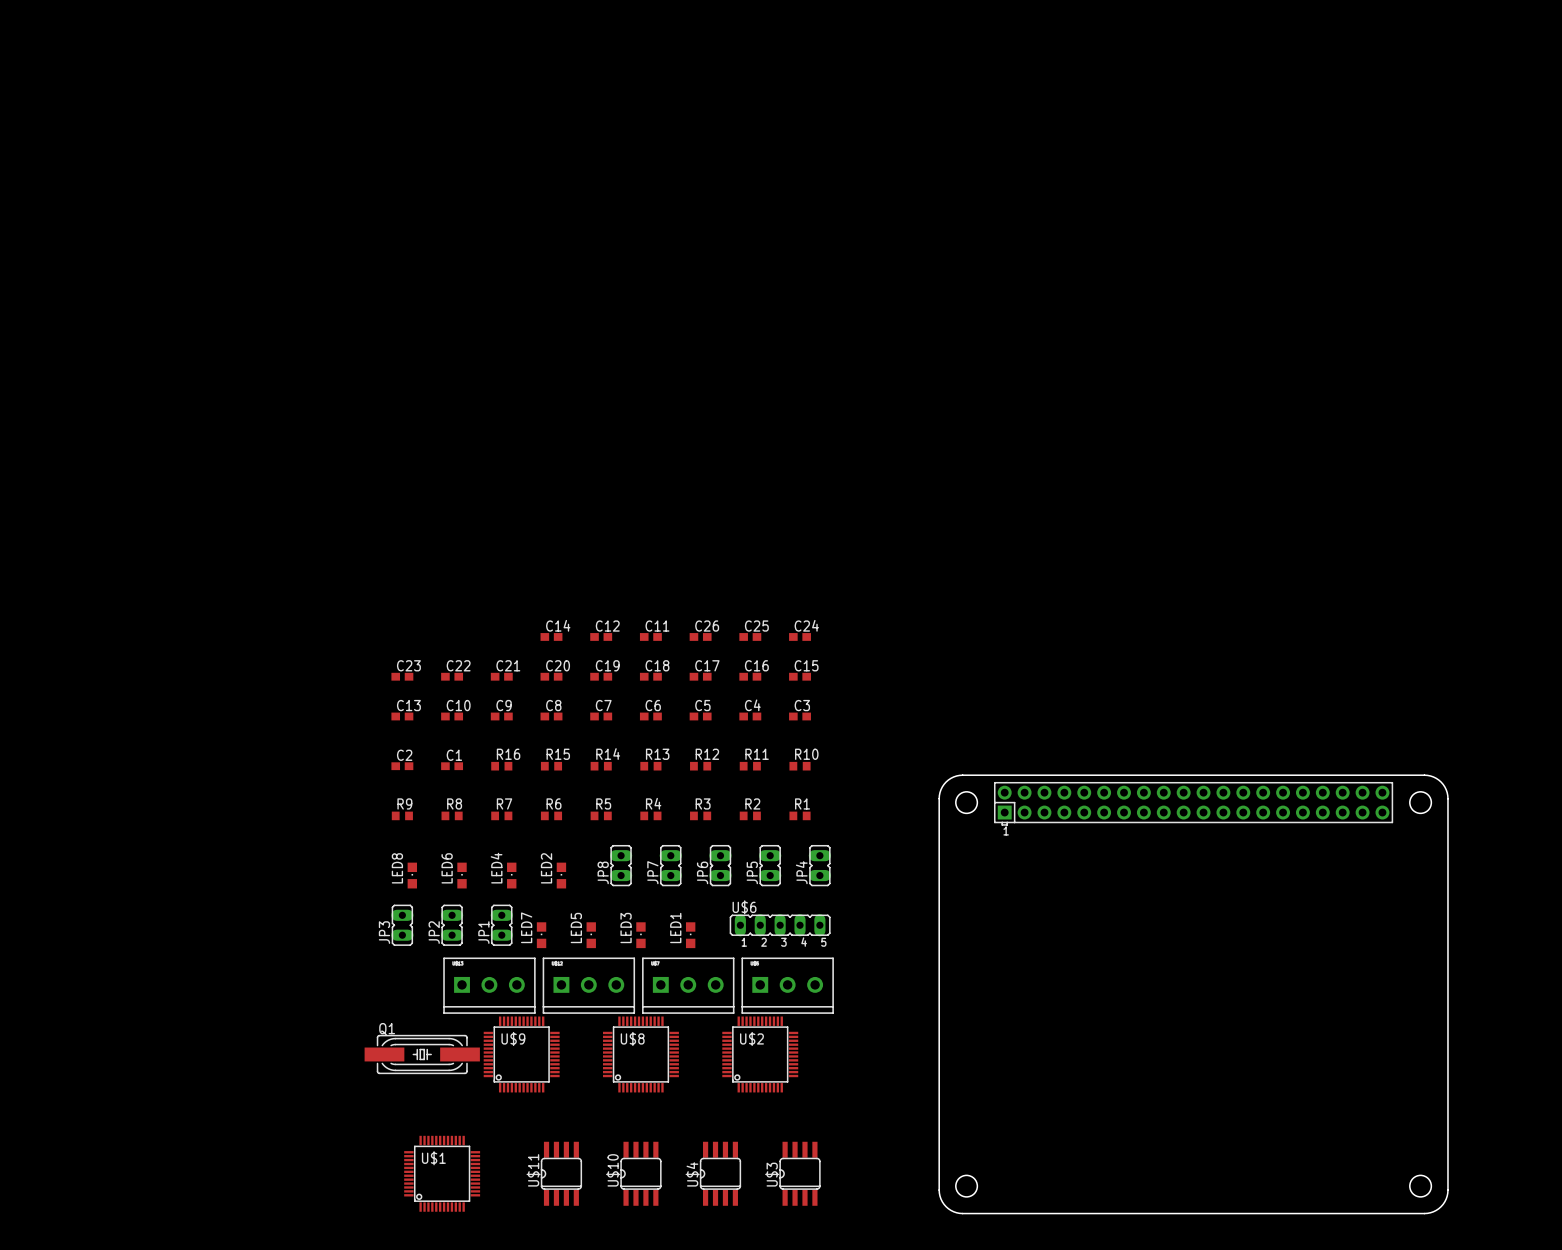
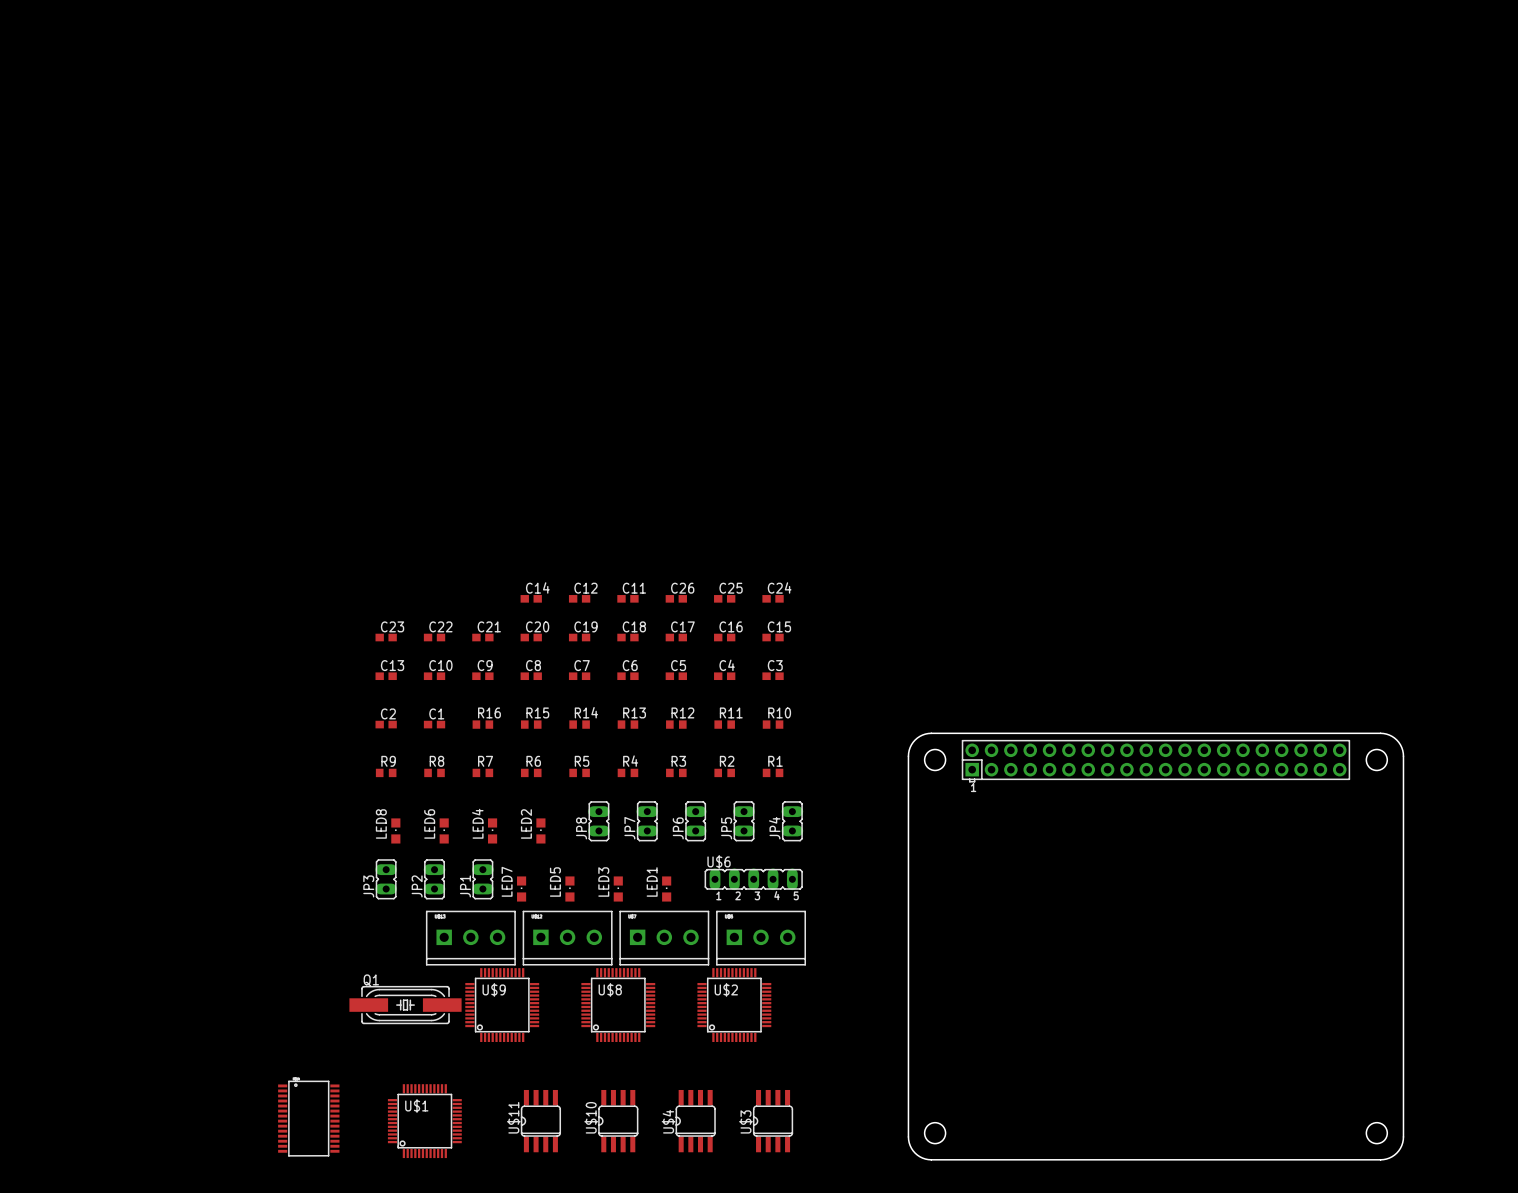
part: none -> (308, 1118)

